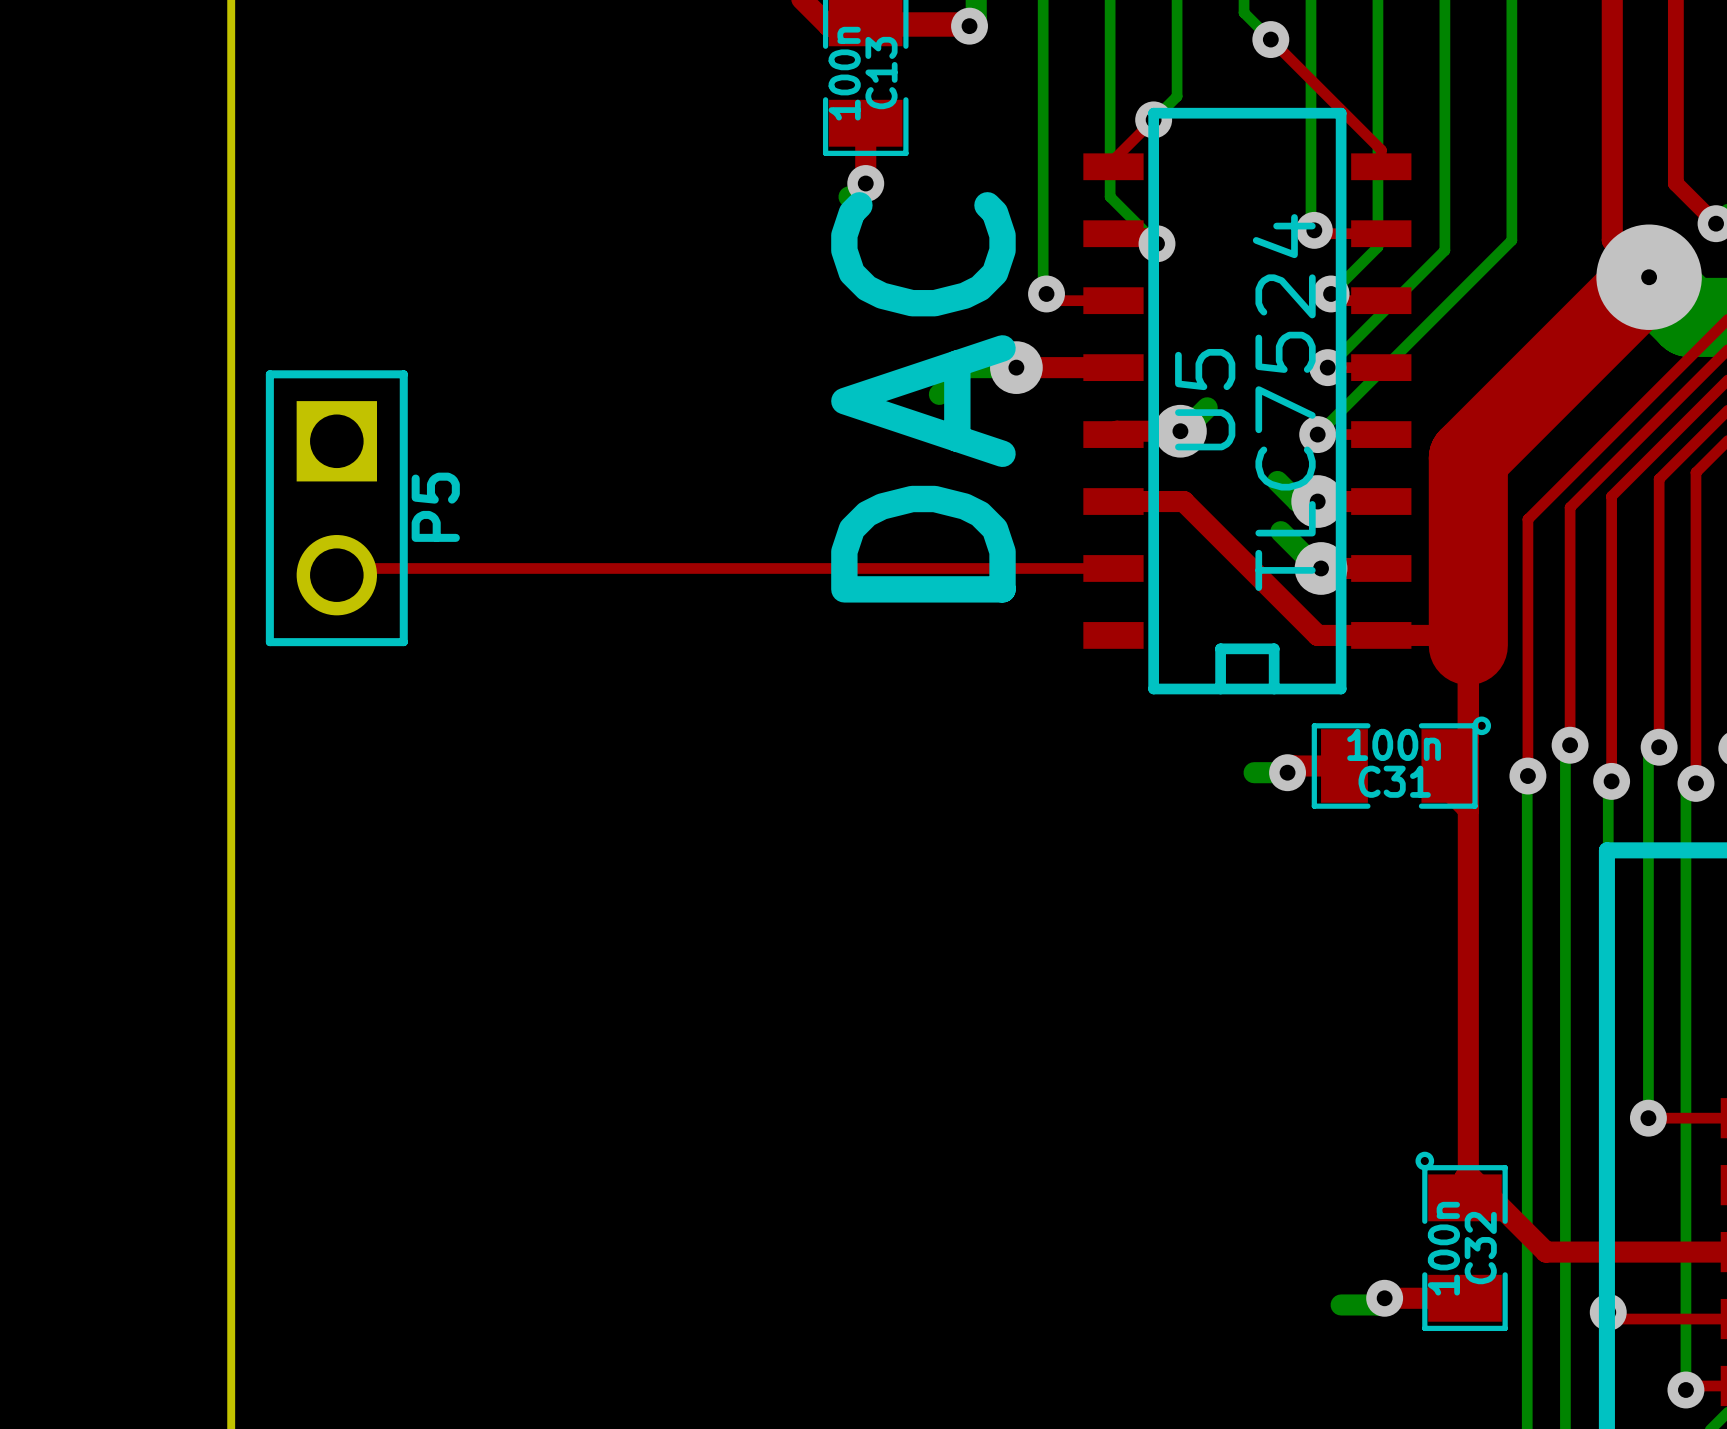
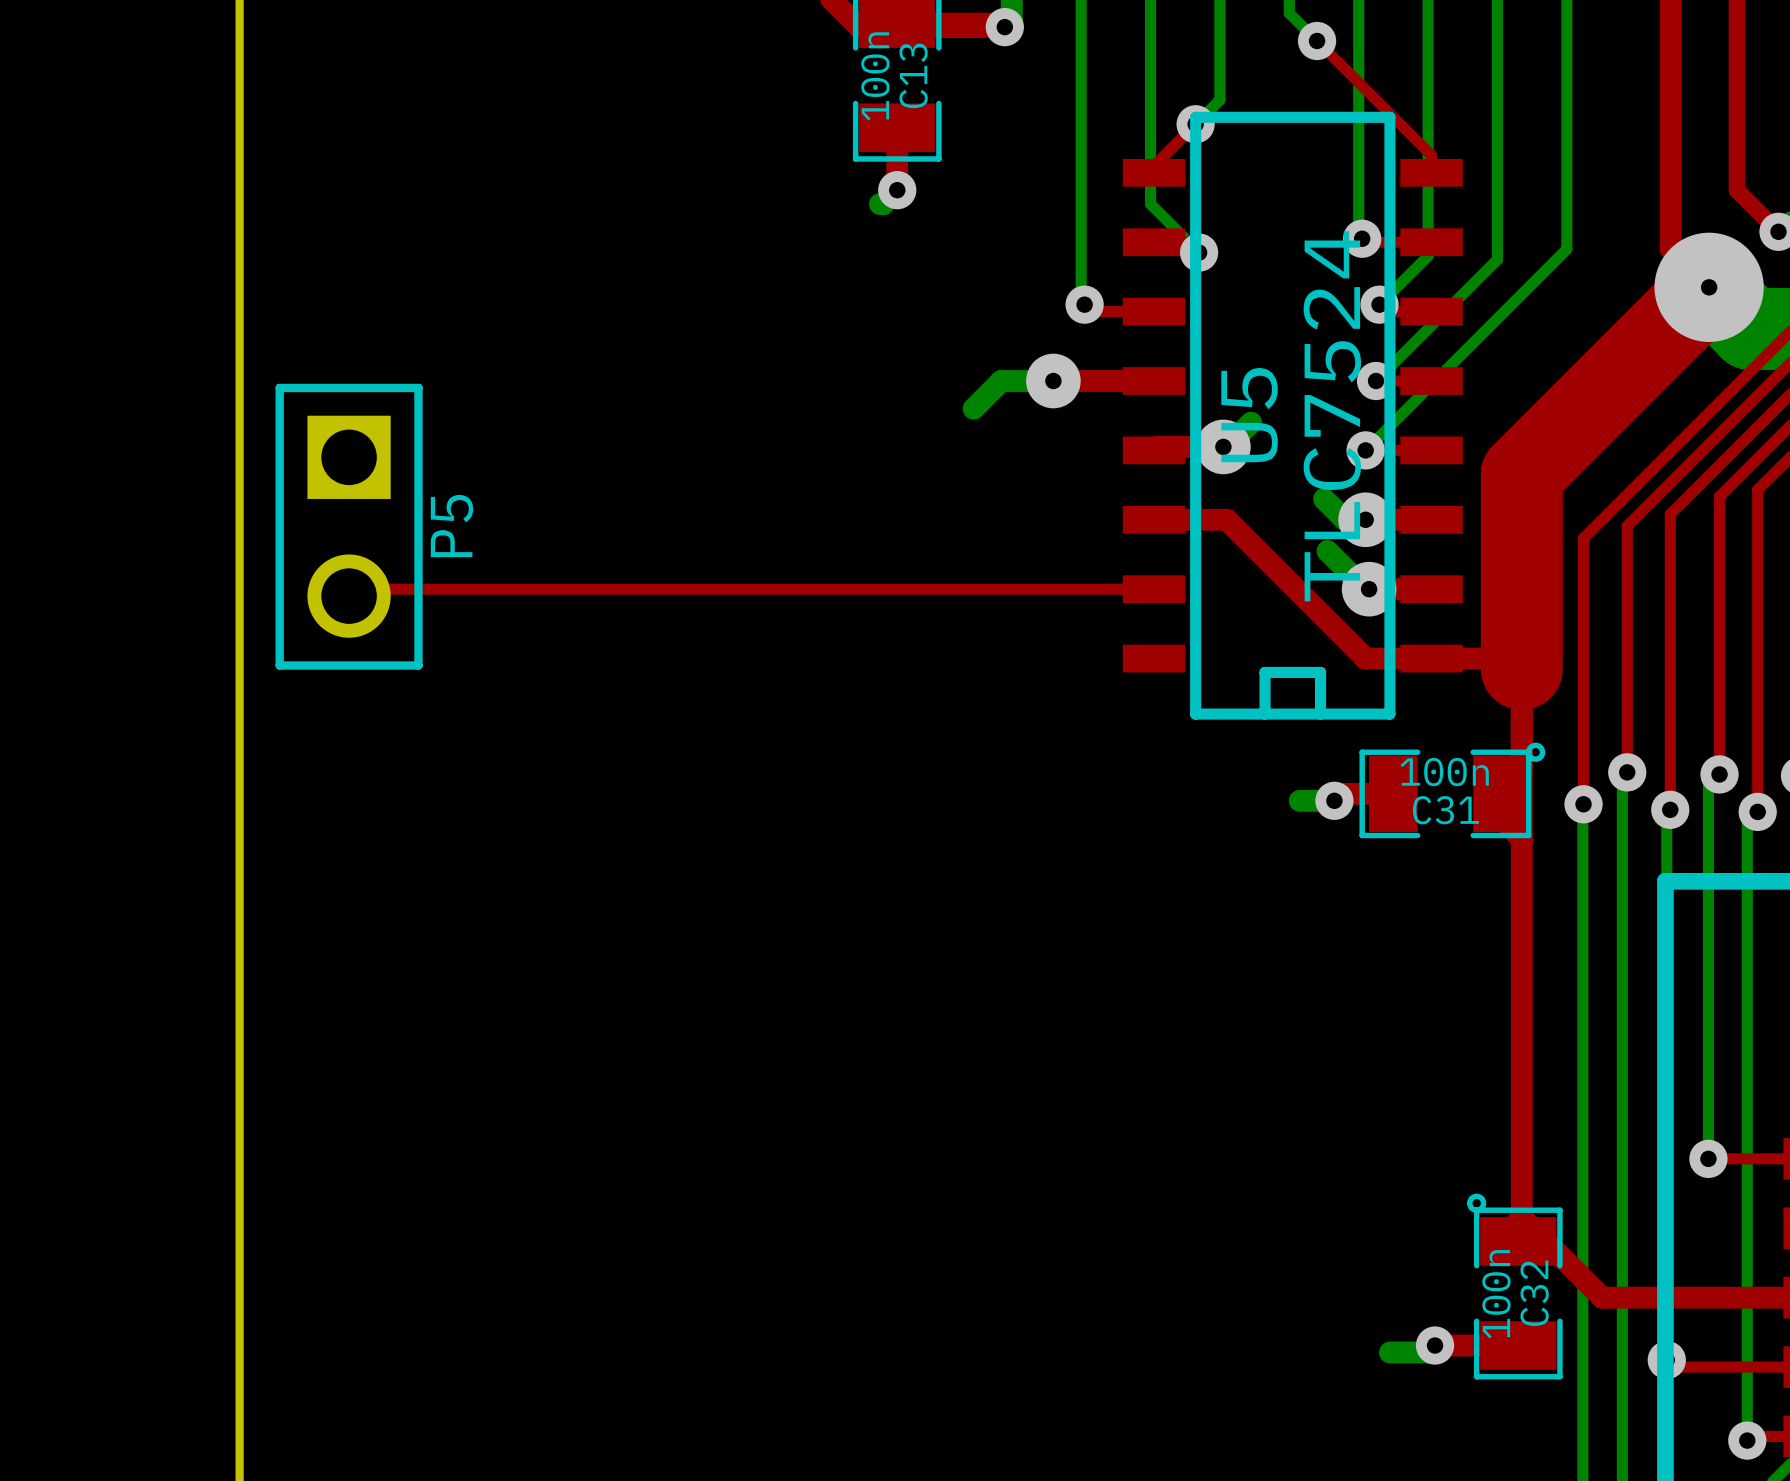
text: DAC (923, 397) -> none

